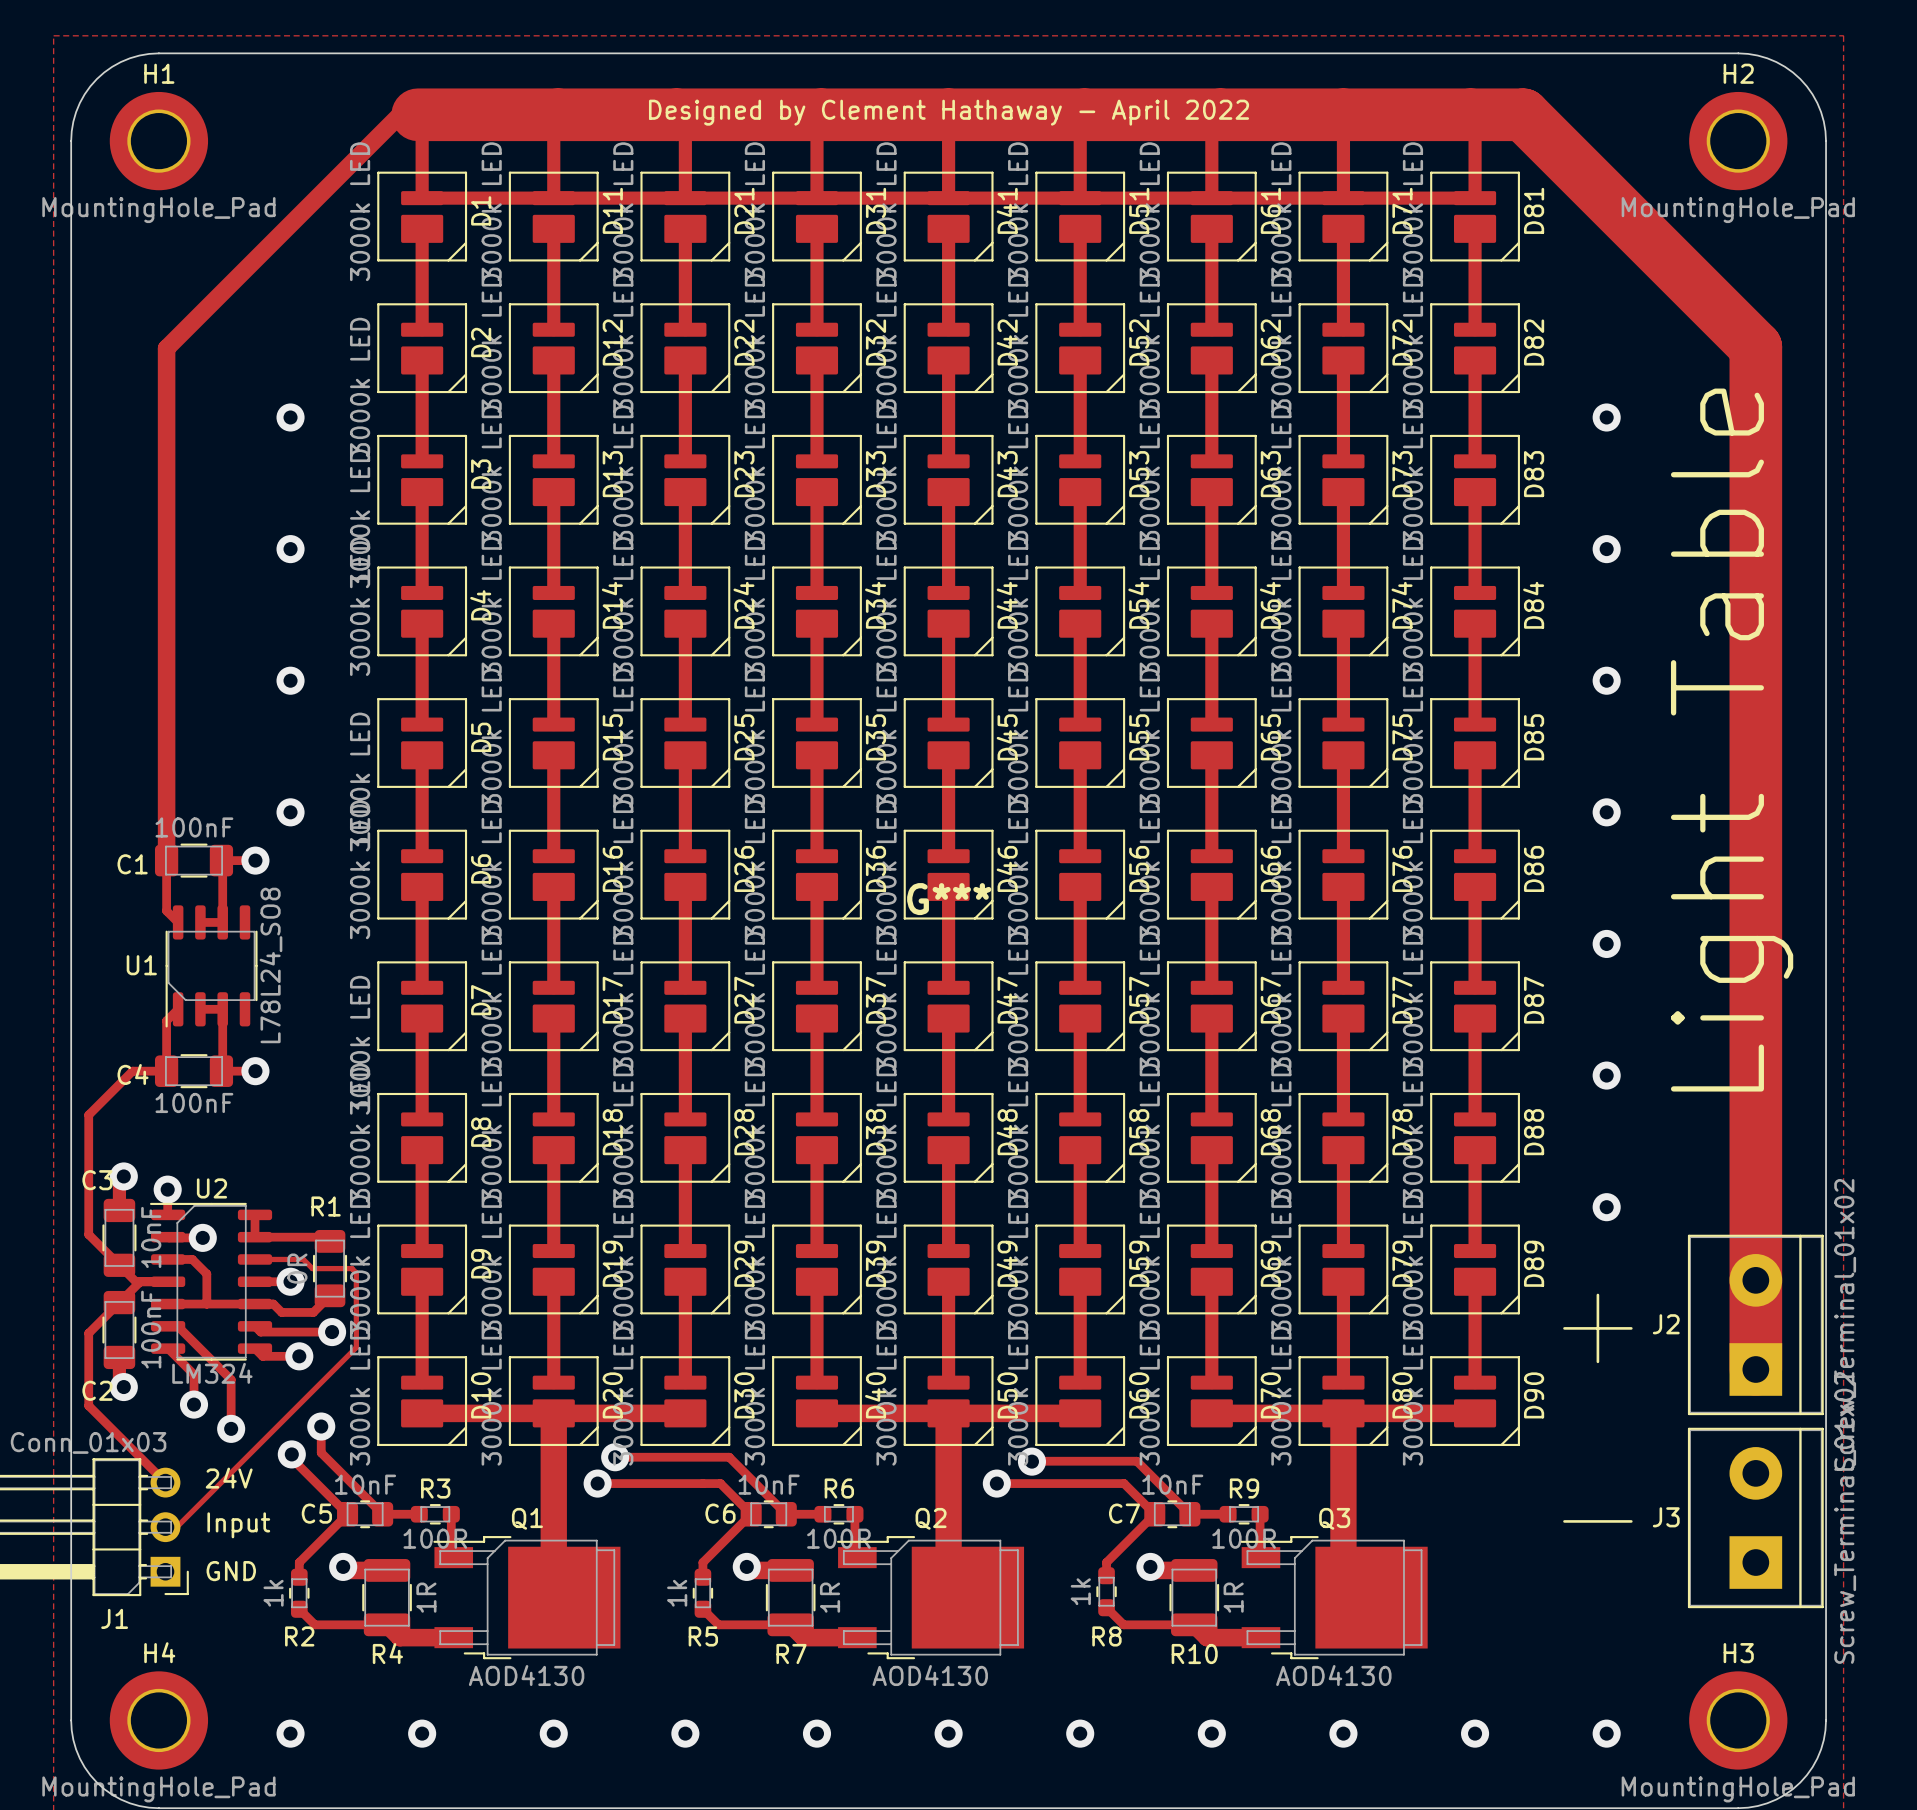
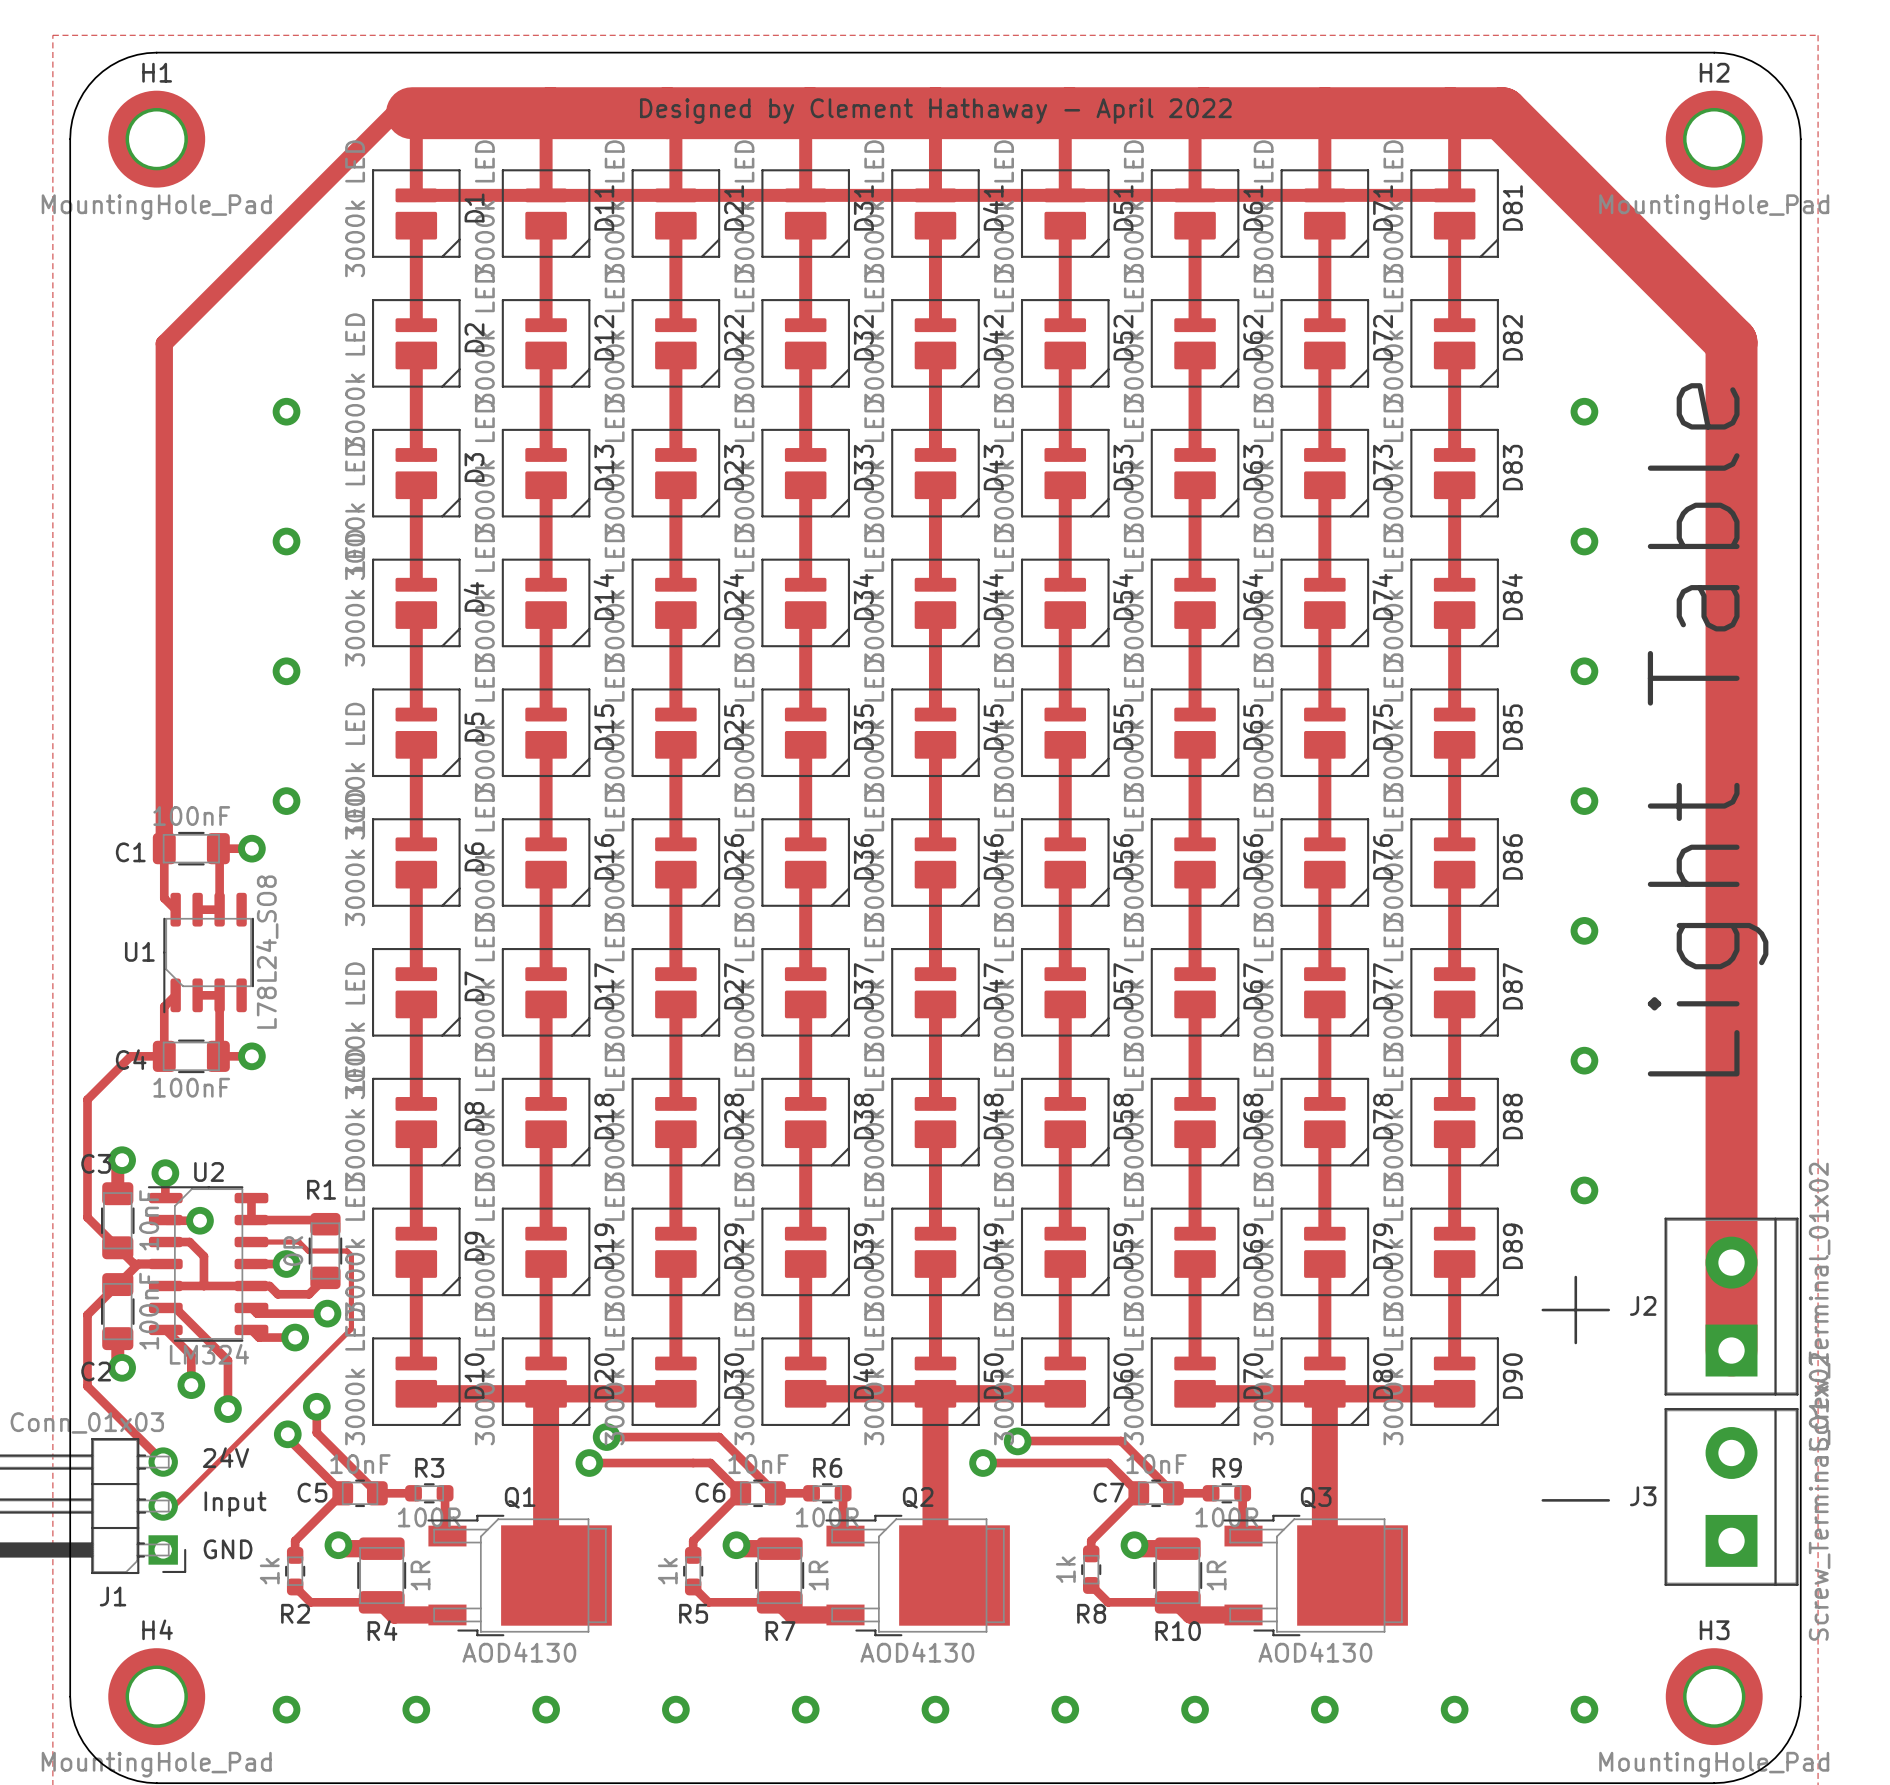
G***: (949, 899) -> none

